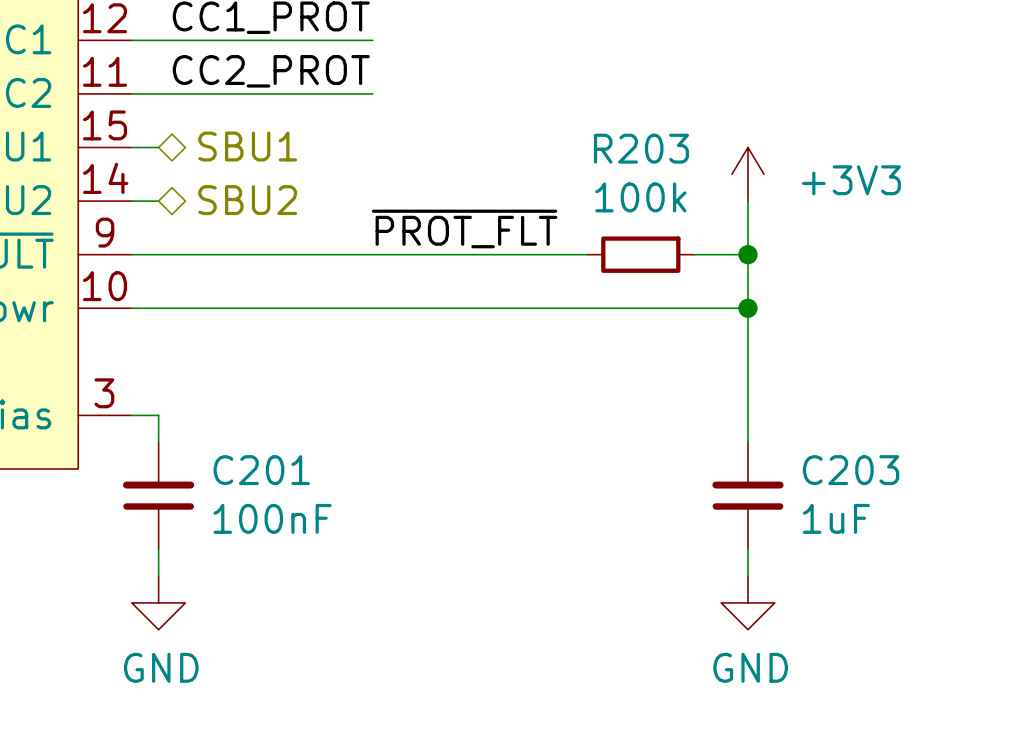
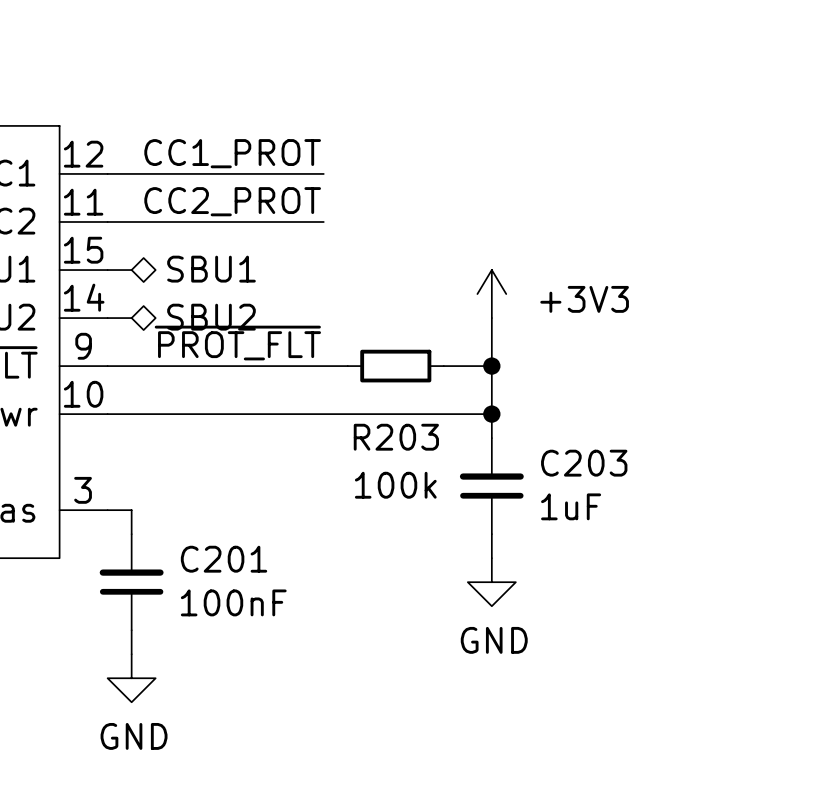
R203 name position: R203 (641, 148) -> R203 (396, 437)
power symbol position: +3V3 (747, 174) -> +3V3 (491, 294)
R203 value position: 100k (640, 197) -> 100k (395, 485)
wire: none -> (491, 318) (491, 438)
wire: (747, 201) (747, 442) -> none
label position: ~{PROT_FLT} (464, 228) -> ~{PROT_FLT} (237, 343)
wire: (399, 254) (506, 254) -> none
wire: (560, 254) (587, 254) -> none
junction: none -> (491, 366)
R203 position: (640, 254) -> (395, 366)
wire: (694, 254) (747, 254) -> none
junction: (747, 254) -> none
wire: (560, 308) (747, 308) -> none
junction: none -> (491, 414)
junction: (747, 308) -> none
C203 position: (747, 495) -> (491, 486)
wire: (747, 549) (747, 576) -> (491, 534) (491, 558)
power symbol position: GND (747, 602) -> GND (491, 582)

